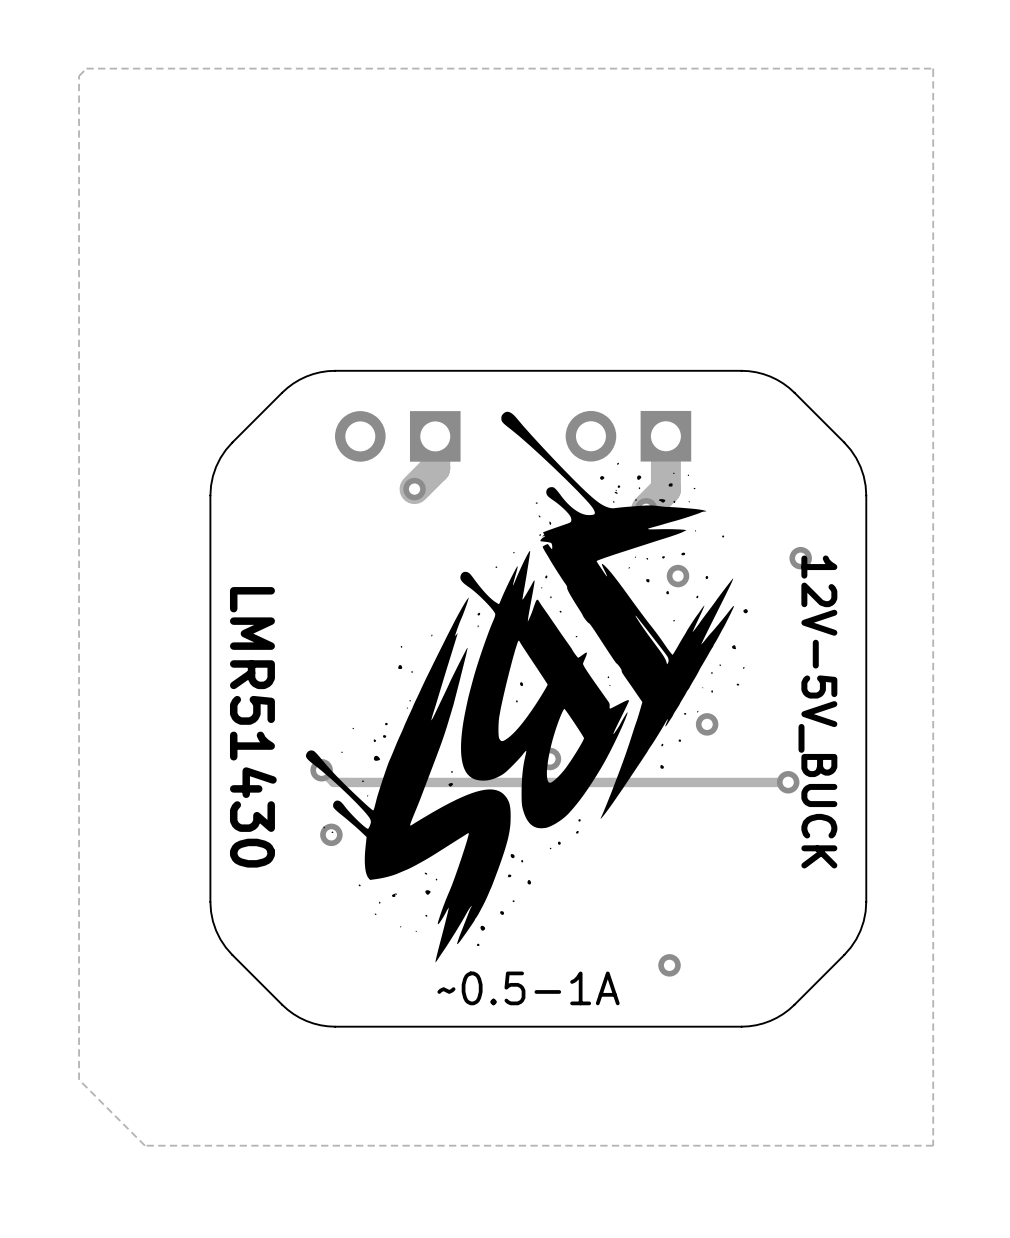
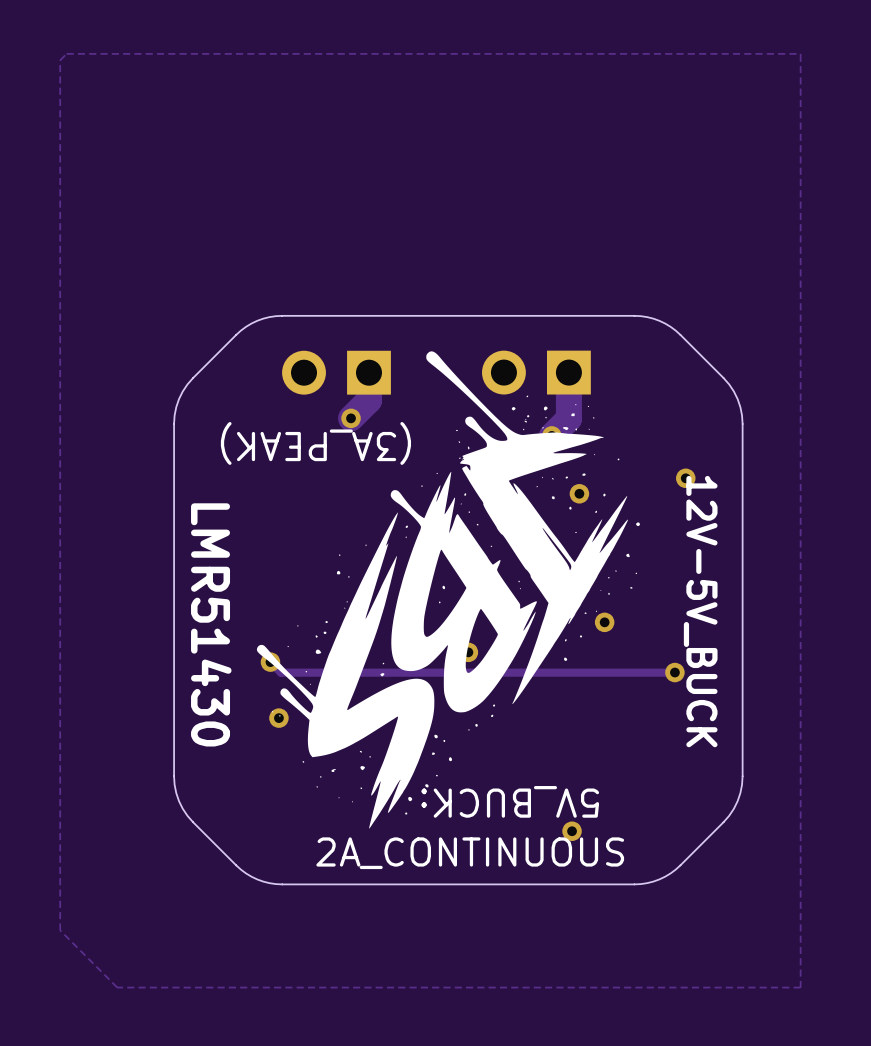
text: none -> (3A_PEAK) (315, 443)
text: none -> 5V_BUCK: (510, 801)
text: ~0.5-1A (528, 988) -> none
text: none -> 2A_CONTINUOUS (470, 853)

